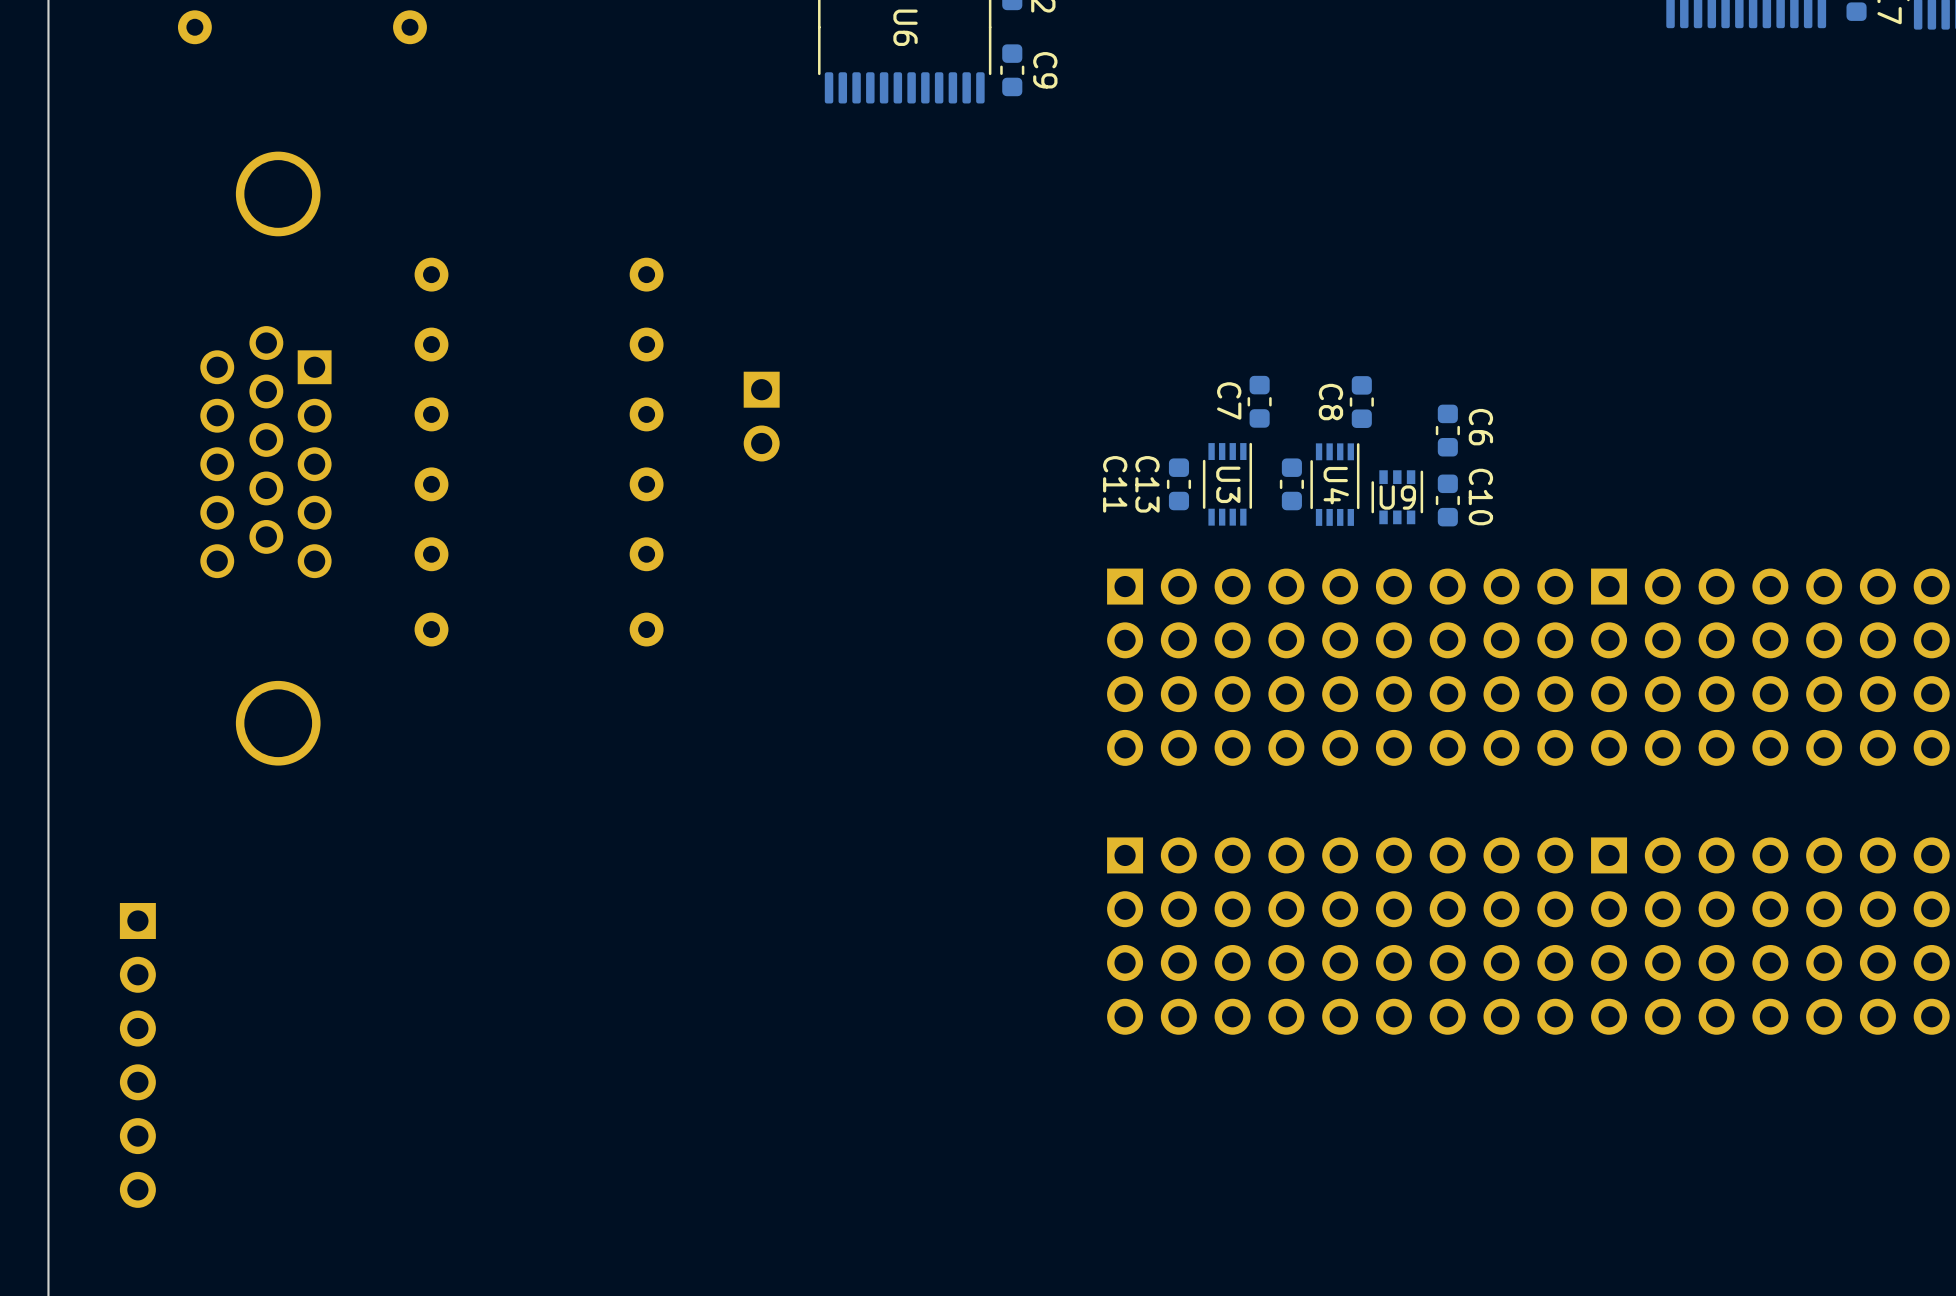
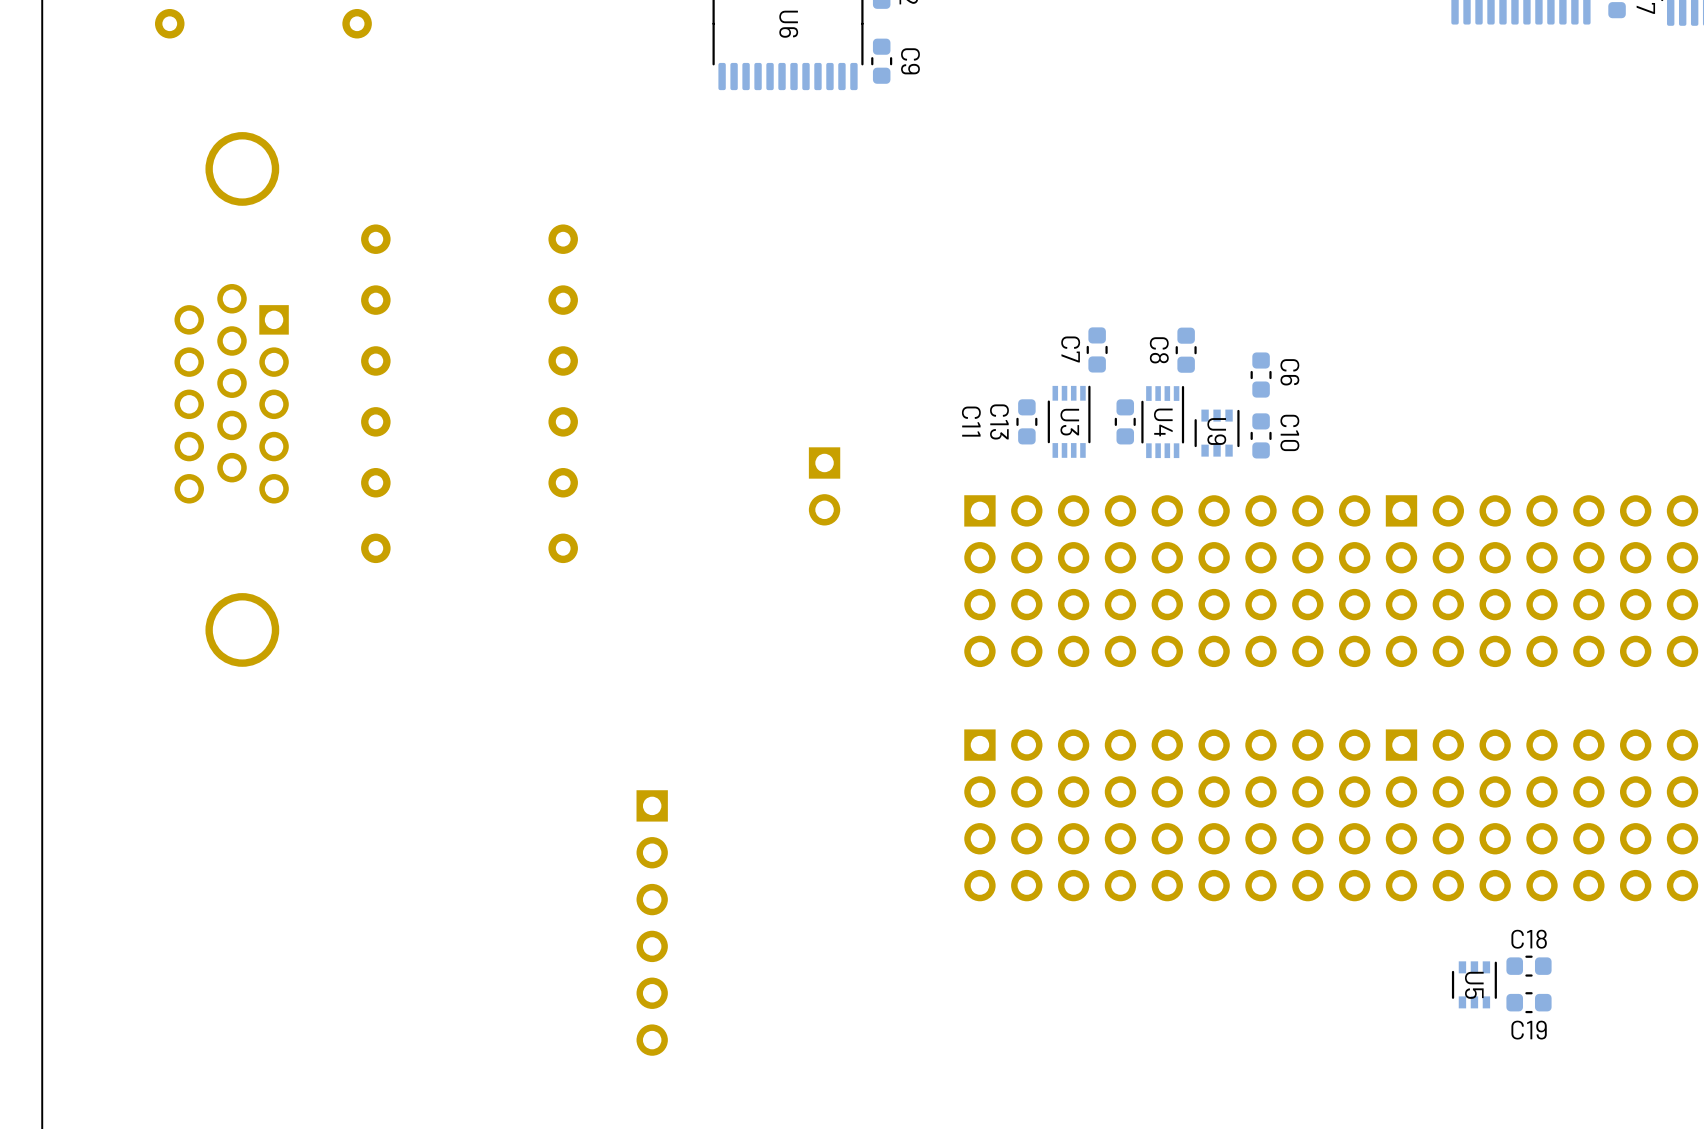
part position: (761, 416) -> (824, 486)
U9 name rotation: 0° (1397, 497) -> 90° clockwise (1216, 431)
part: (137, 1055) -> none
part: none -> (652, 923)
C18: none -> (1528, 966)
U5: none -> (1474, 984)
C19: none -> (1528, 1002)

